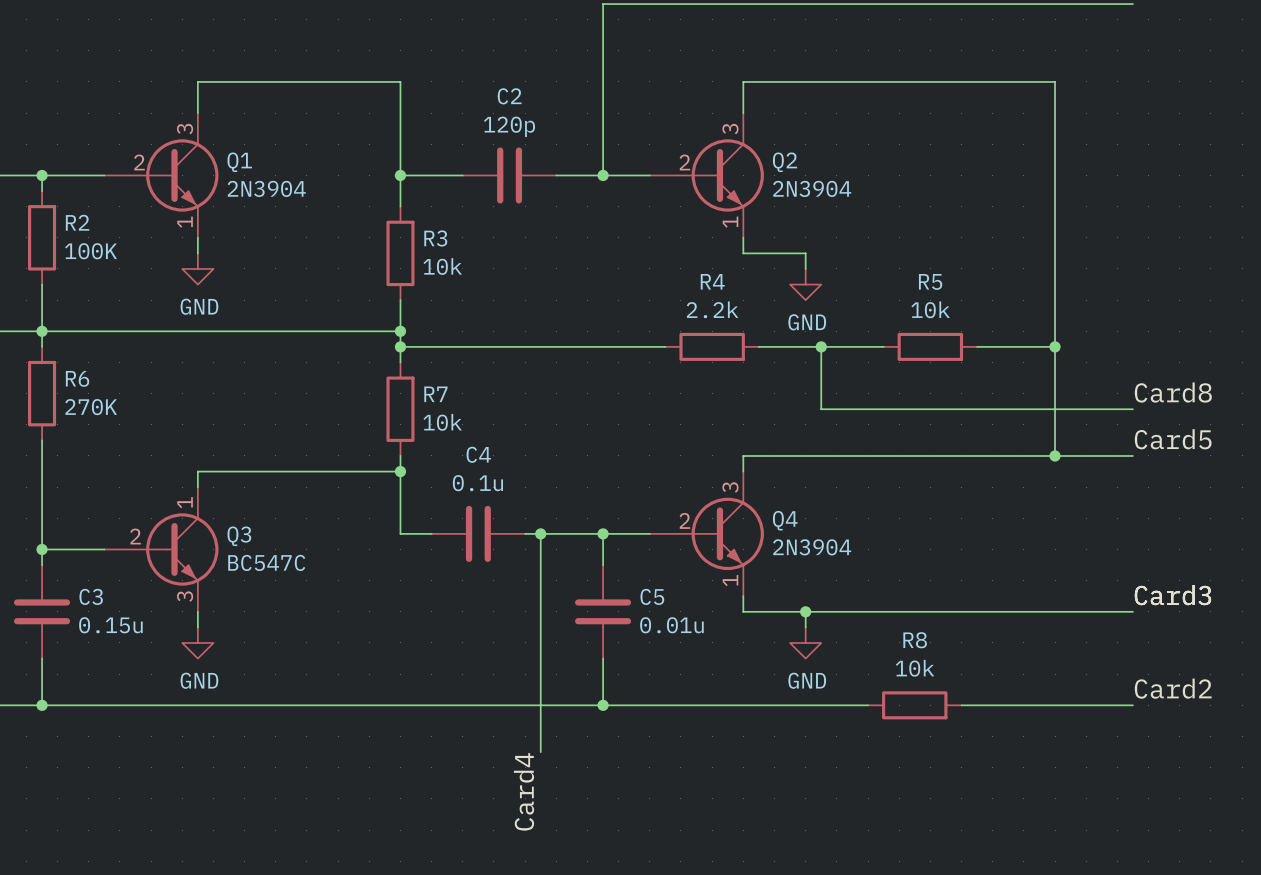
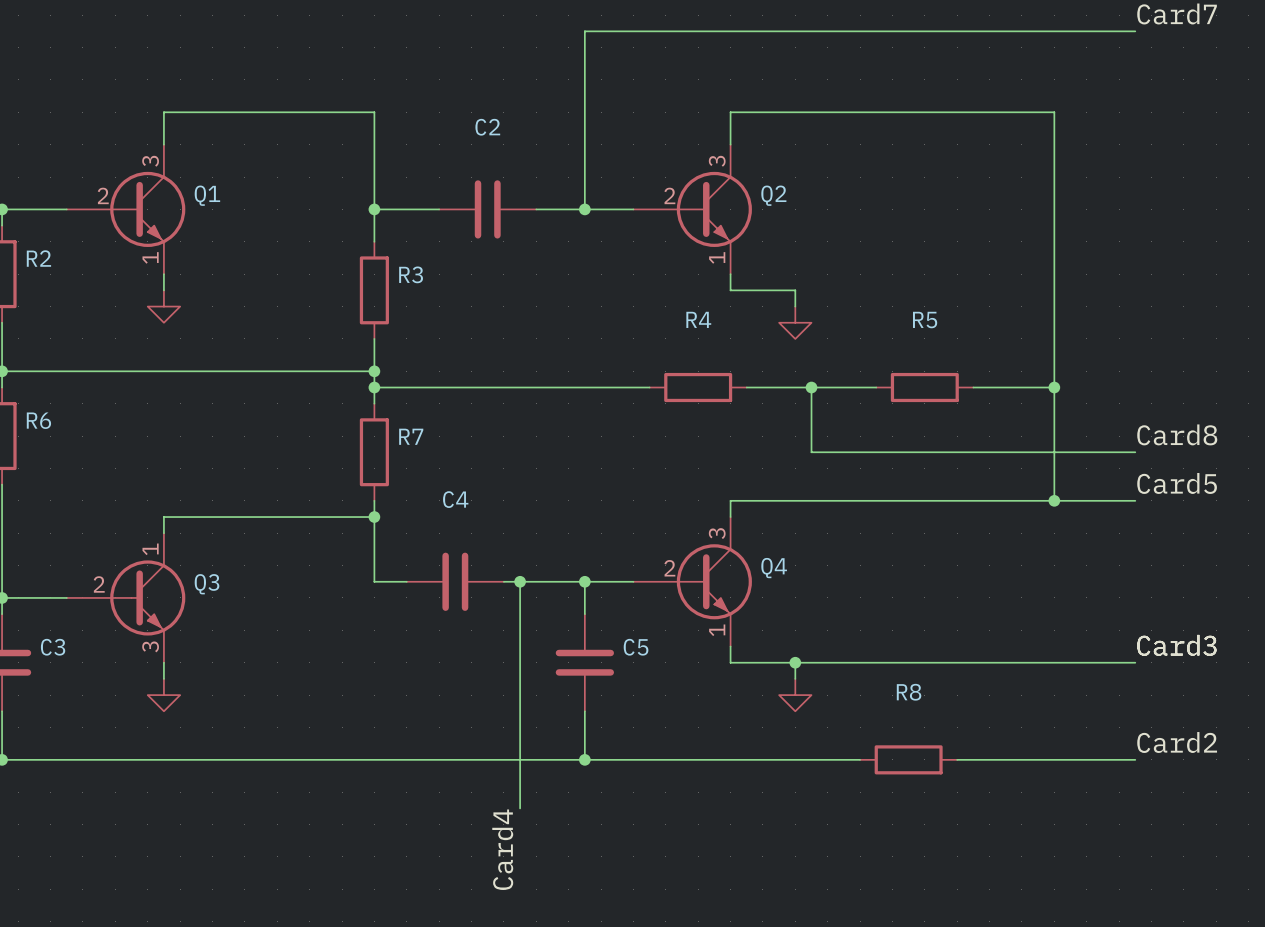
C2 value: 120p (509, 126) -> none
Q1 value: 2N3904 (266, 188) -> none
Q2 value: 2N3904 (812, 188) -> none
R2 value: 100K (91, 251) -> none
R3 value: 10k (442, 266) -> none
power symbol text: GND (199, 306) -> none
R4 value: 2.2k (712, 309) -> none
R5 value: 10k (930, 309) -> none
power symbol text: GND (807, 322) -> none
R6 value: 270K (91, 407) -> none
R7 value: 10k (442, 422) -> none
C4 value: 0.1u (477, 483) -> none
Q4 value: 2N3904 (812, 547) -> none
Q3 value: BC547C (266, 562) -> none
C3 value: 0.15u (110, 625) -> none
C5 value: 0.01u (671, 625) -> none
R8 value: 10k (915, 668) -> none
power symbol text: GND (199, 680) -> none
power symbol text: GND (807, 680) -> none

